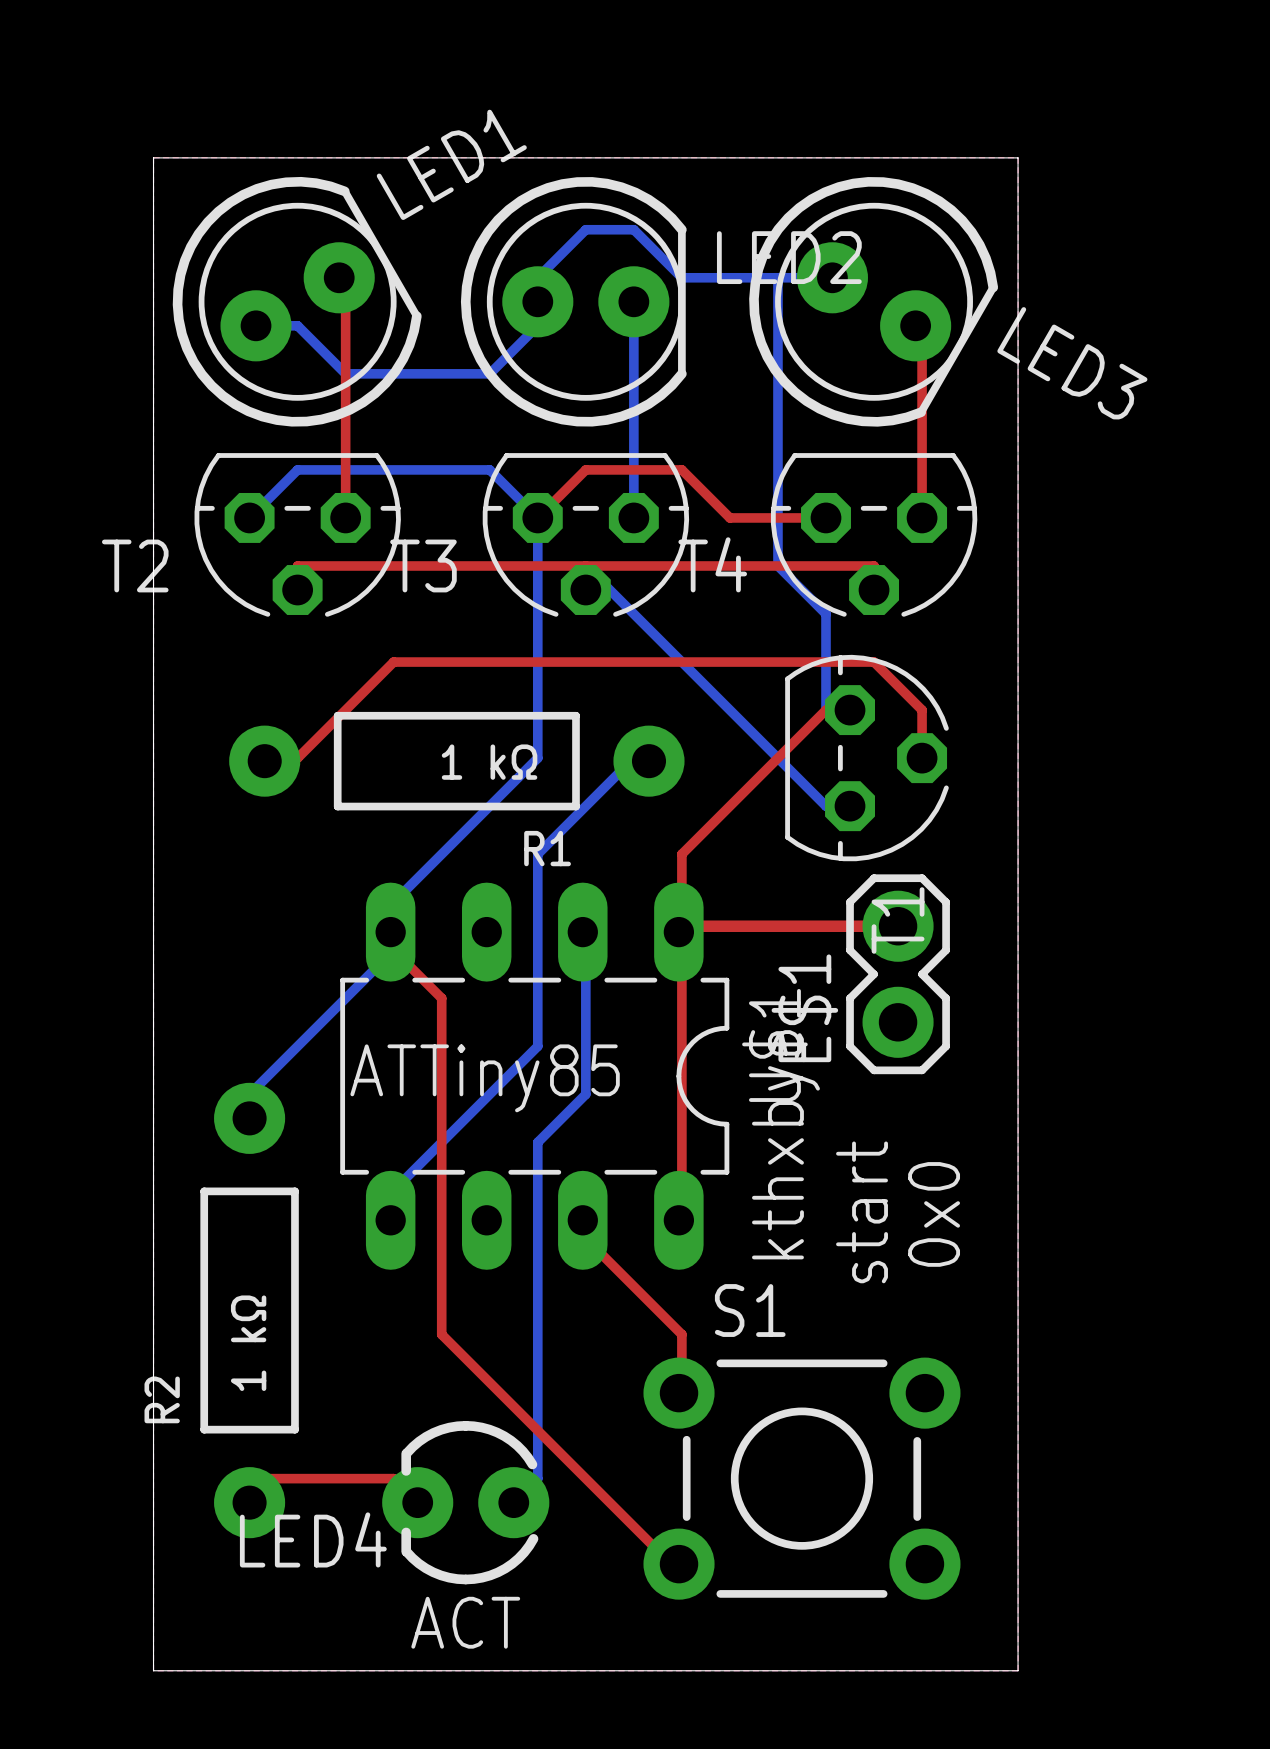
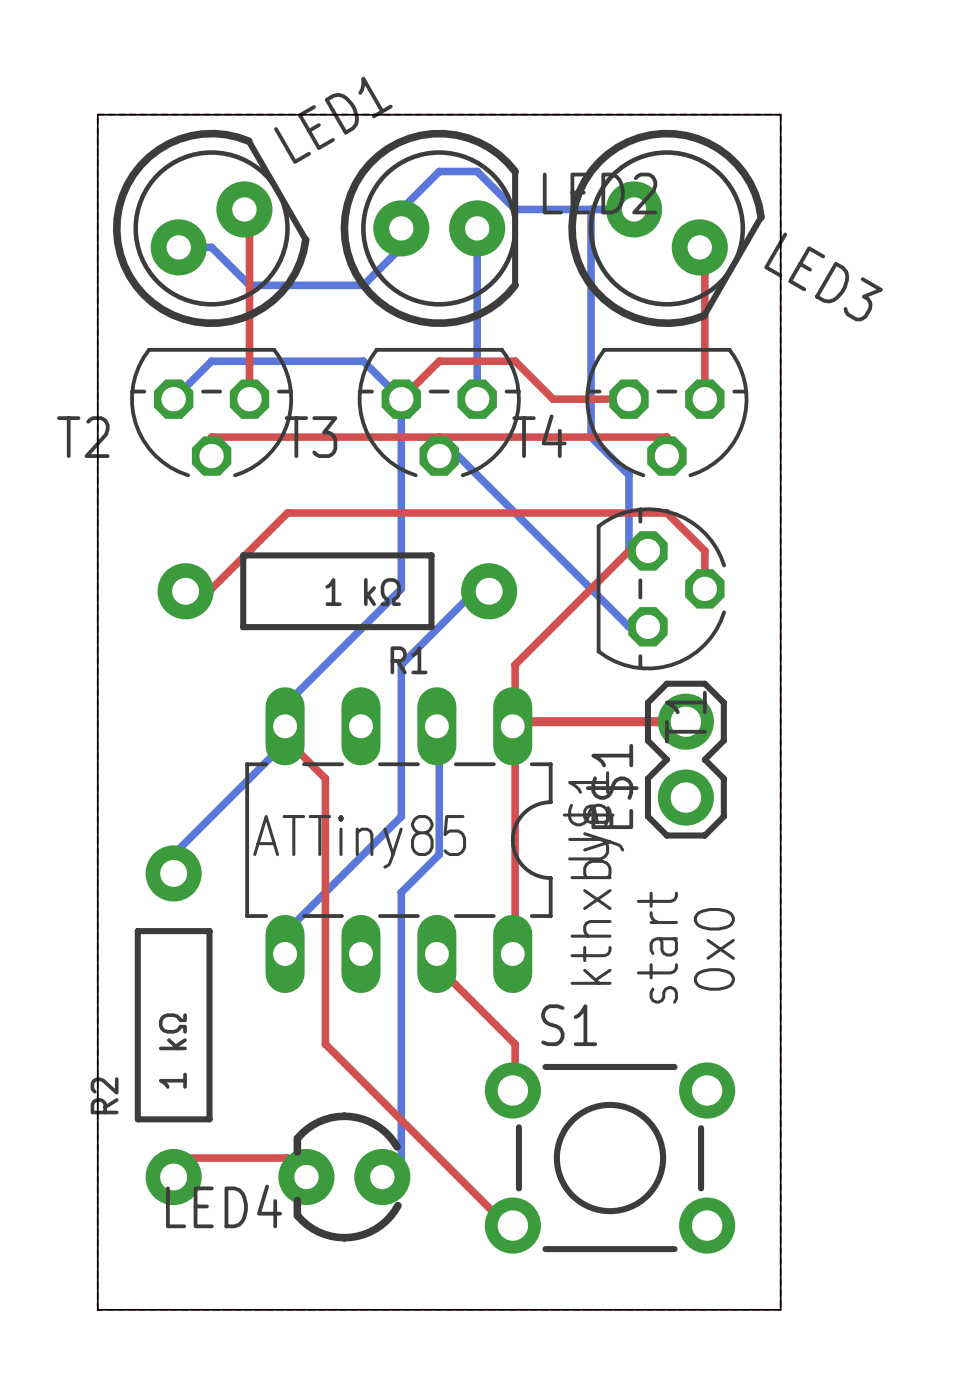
text: ACT (465, 1622) -> none

